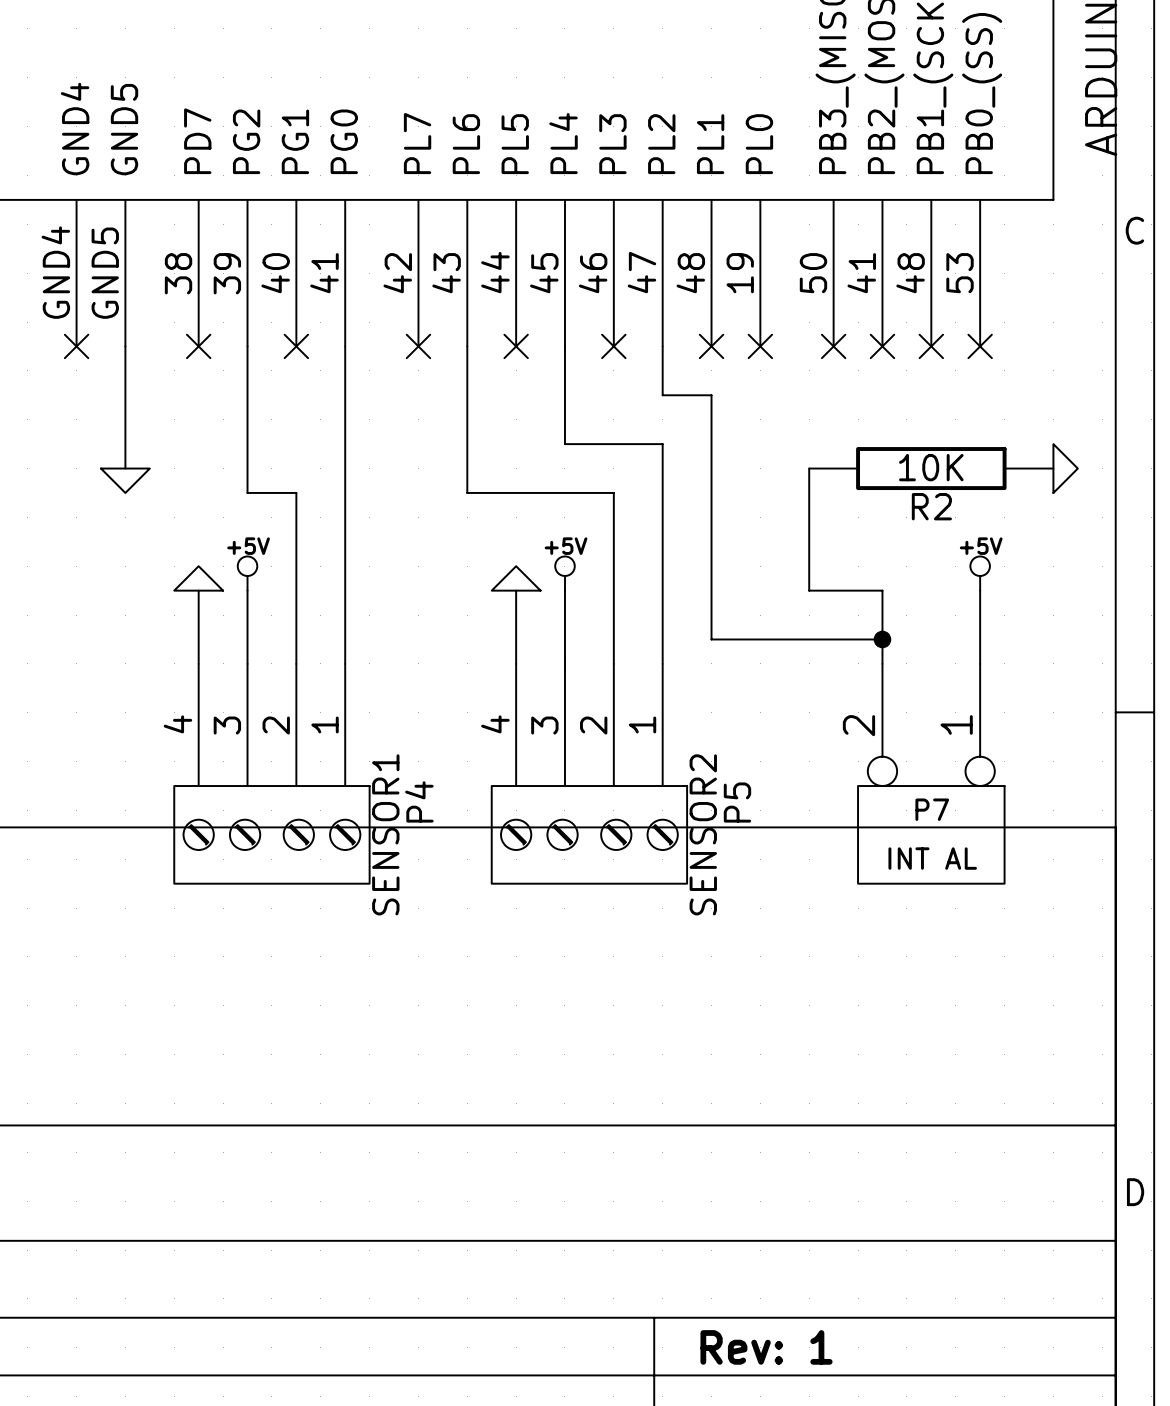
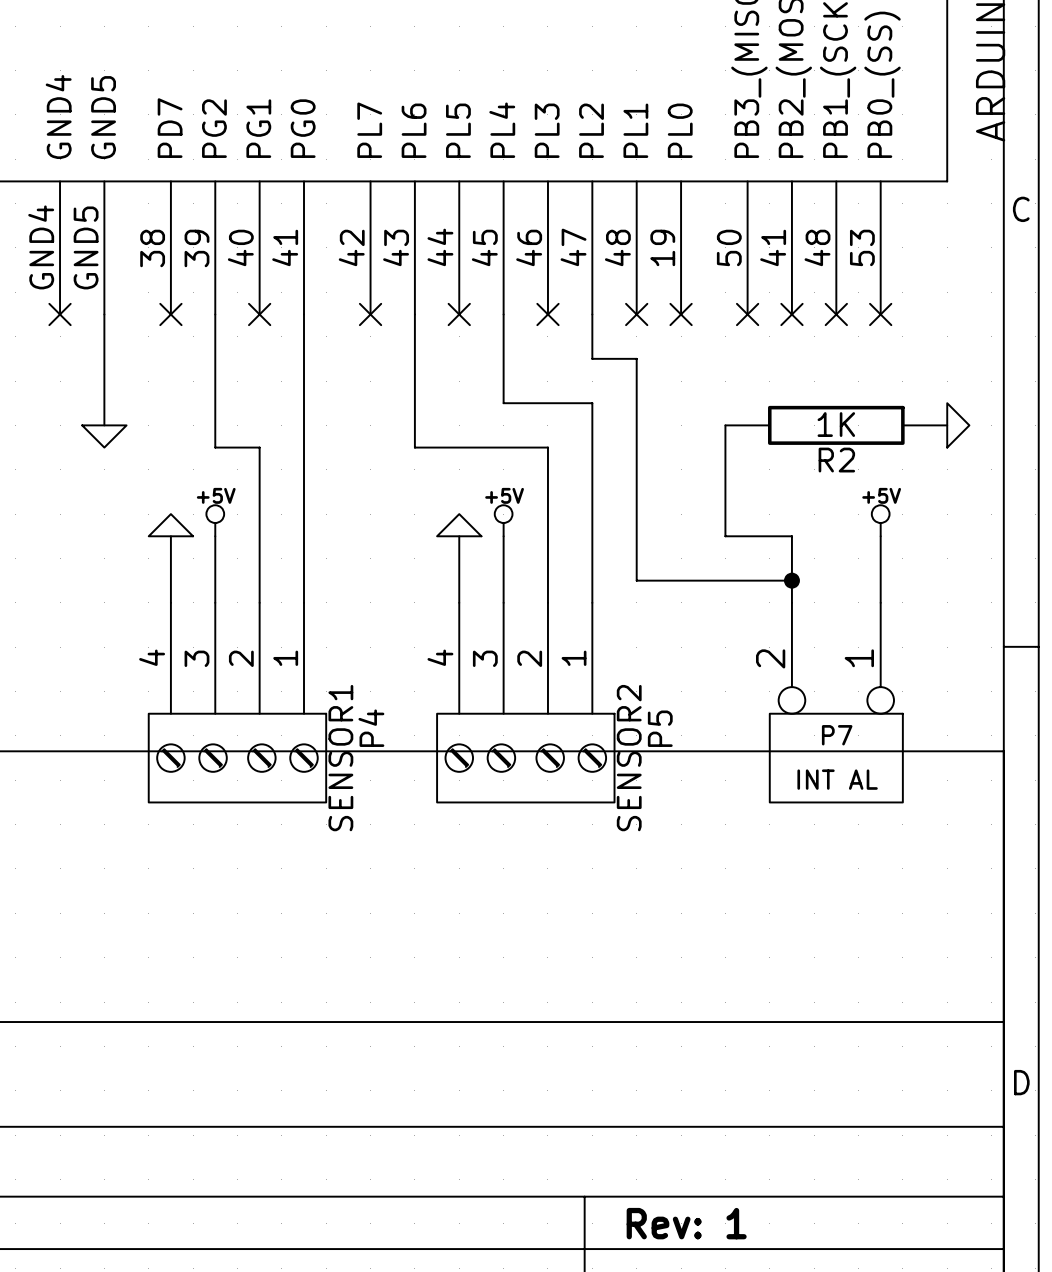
R2 value: 10K (931, 467) -> 1K (836, 424)

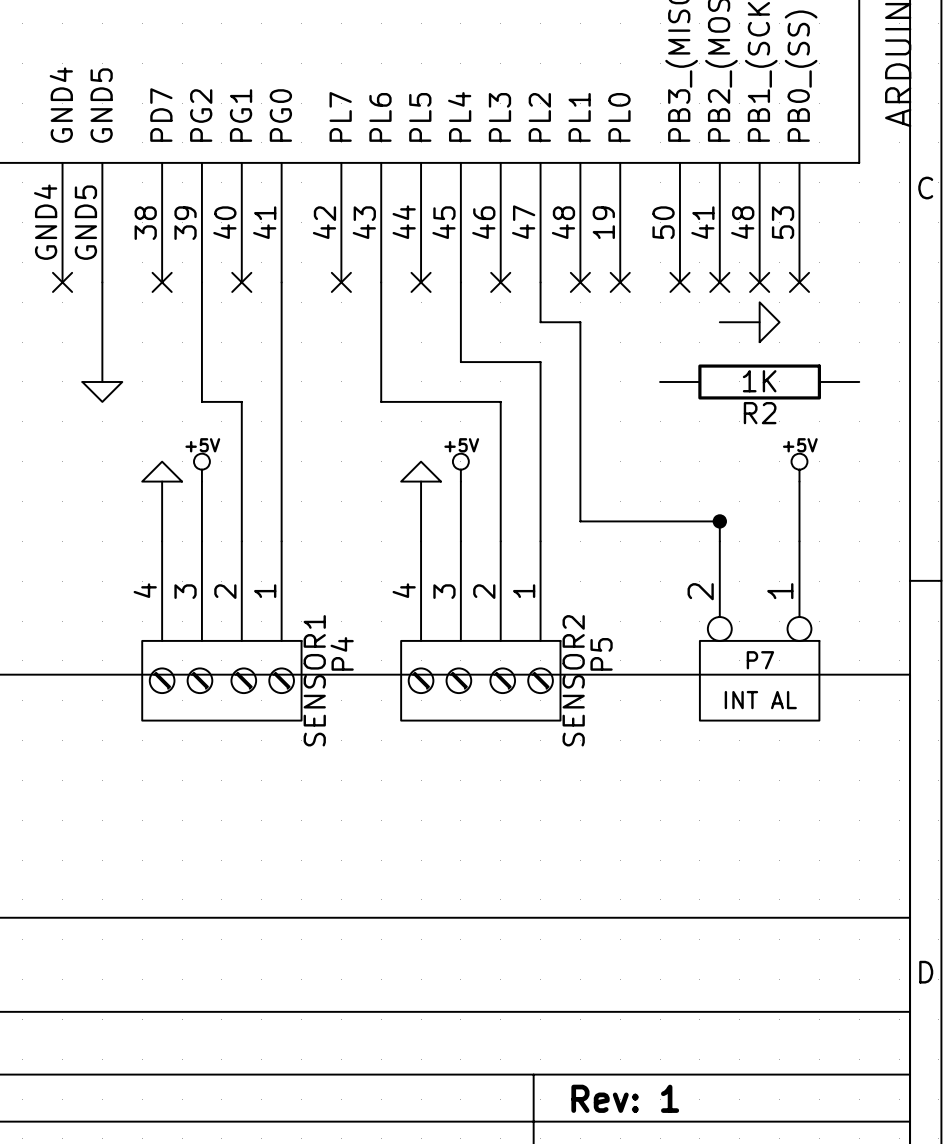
wire: none -> (719, 322) (759, 322)
wire: (725, 425) (725, 536) (791, 536) (791, 580) -> none
power symbol position: (958, 425) -> (769, 322)

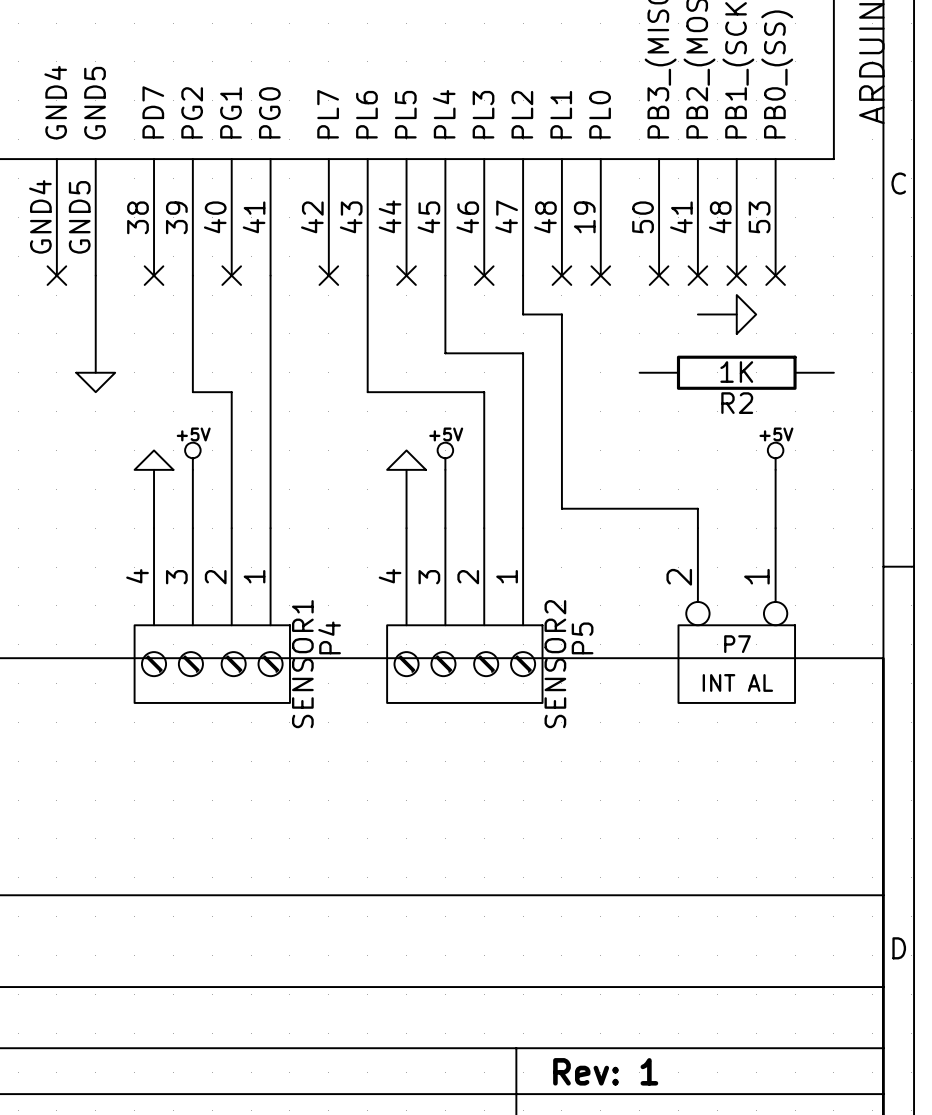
junction: (719, 521) -> none

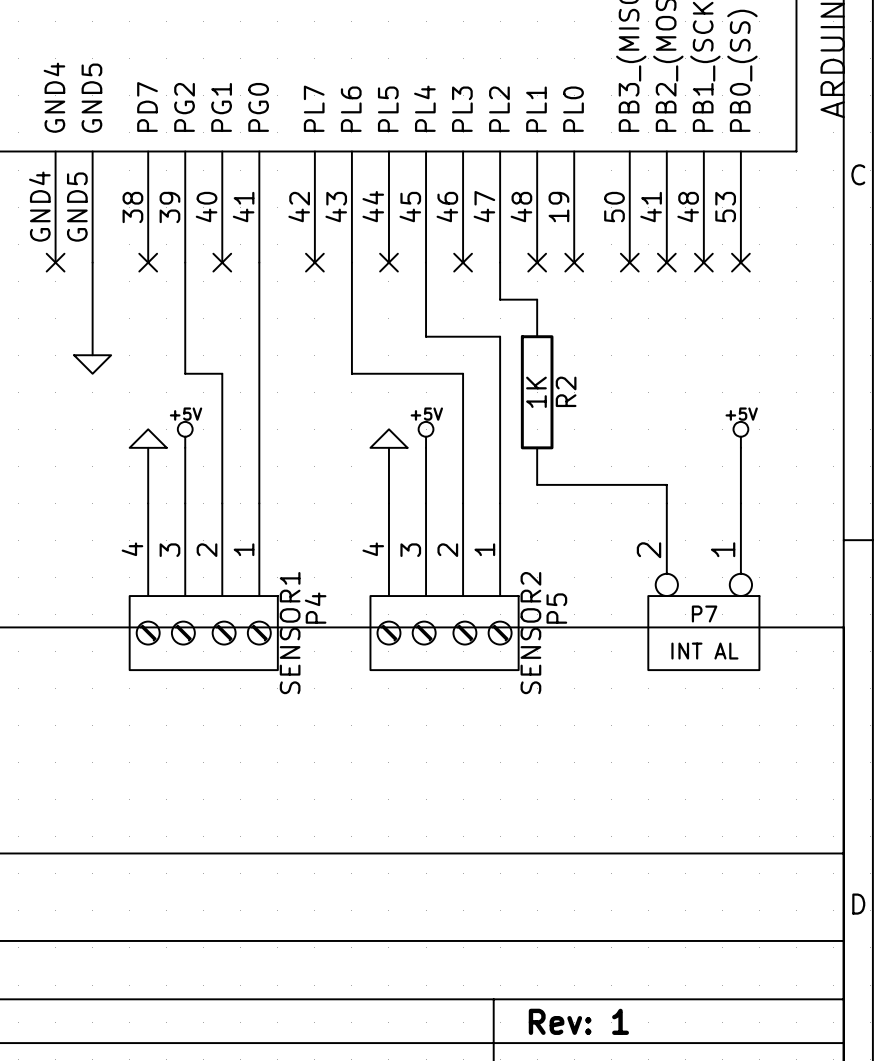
wire: (561, 314) (561, 508) -> none
wire: (697, 314) (736, 314) -> none
power symbol: (746, 314) -> none
R2 rotation: 0° (736, 372) -> 90° clockwise (537, 392)
R2 position: (736, 372) -> (537, 392)
R2 name position: R2 (737, 403) -> R2 (566, 391)

